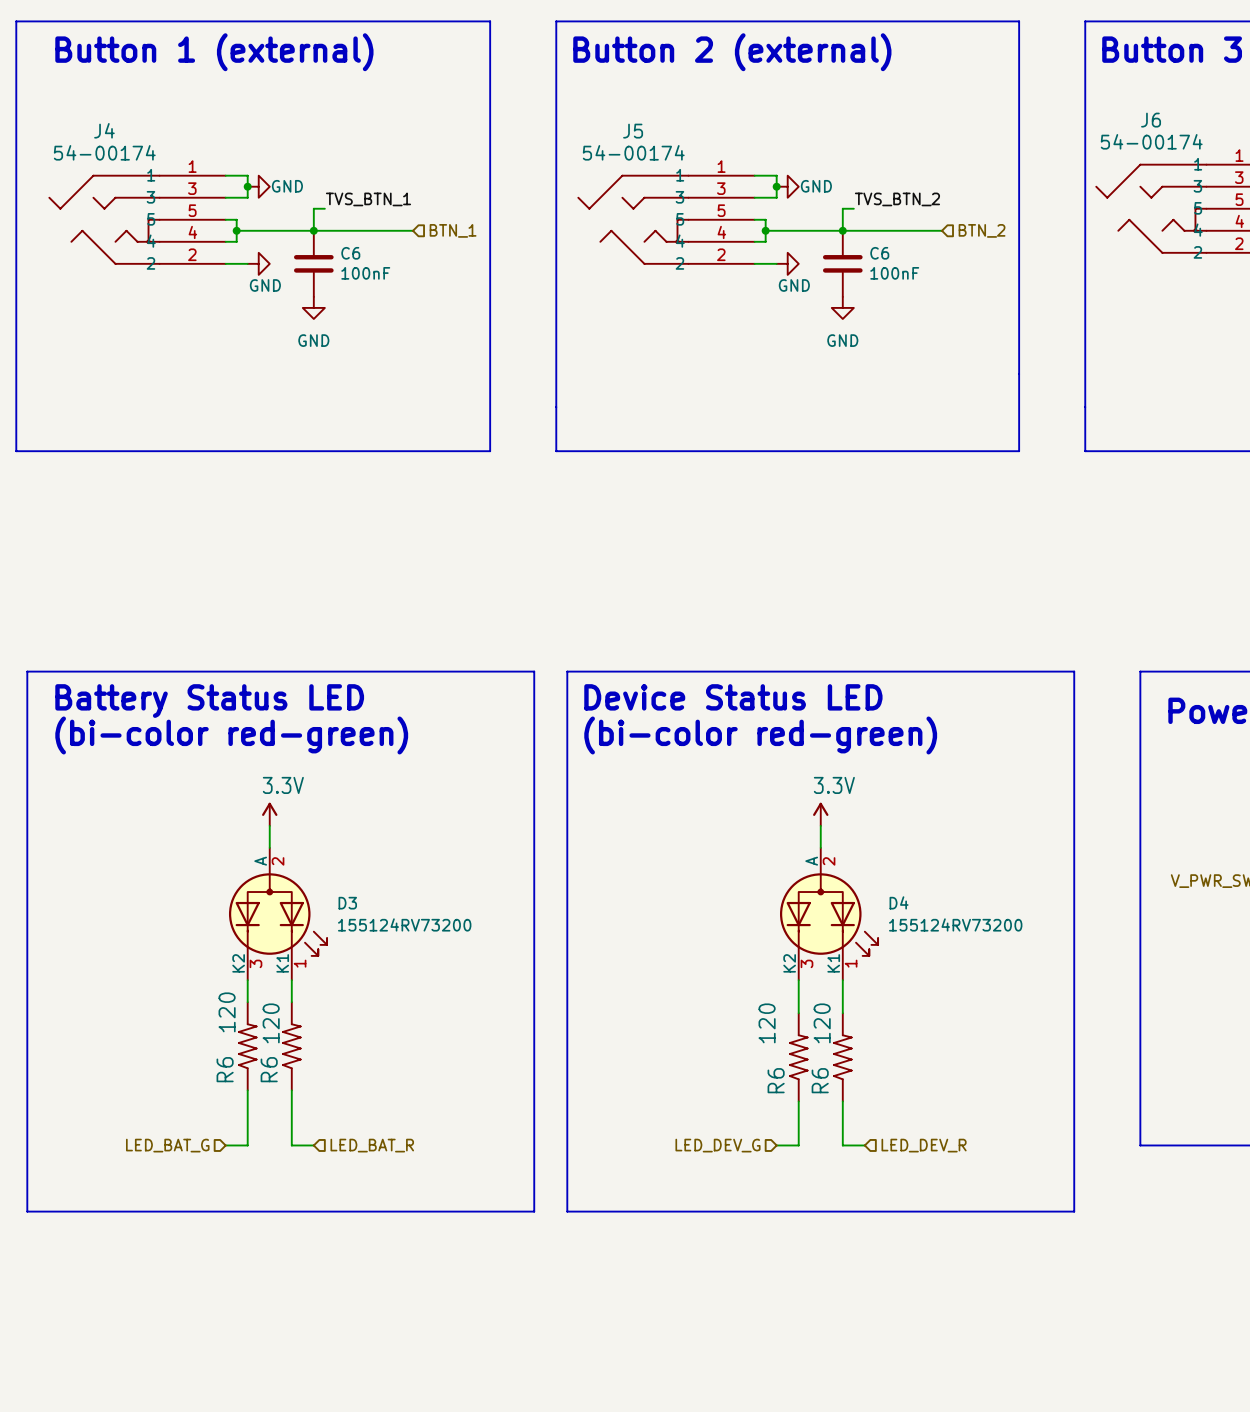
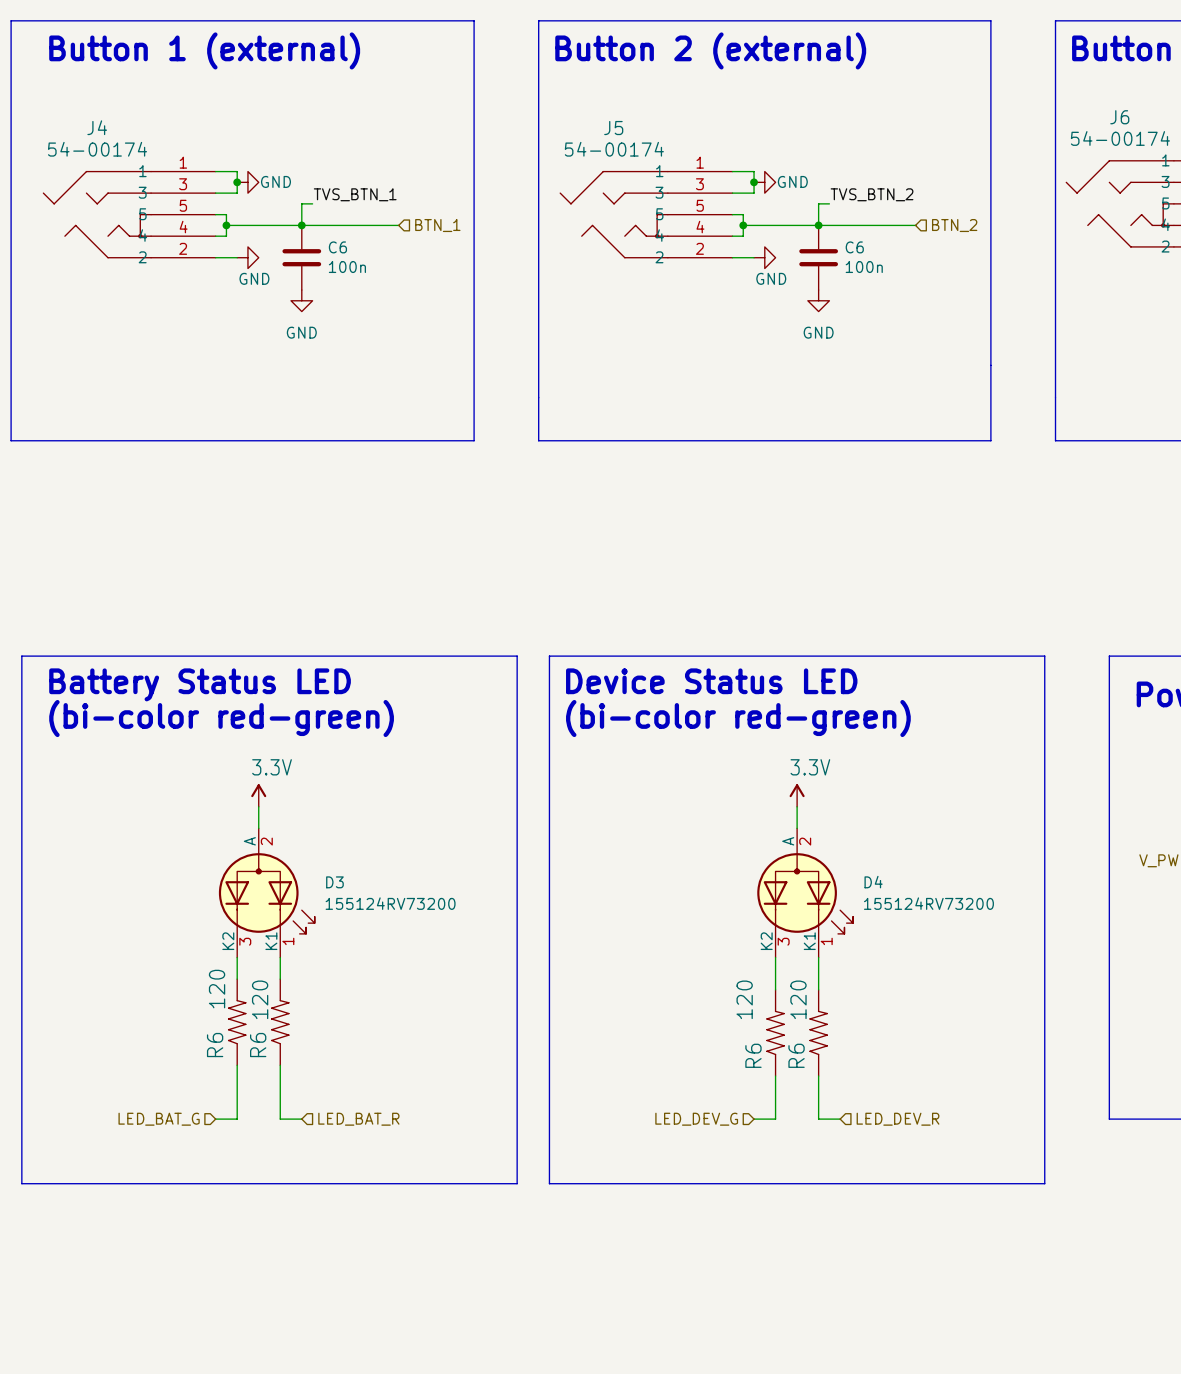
C6 value: 100nF (365, 273) -> 100n (347, 267)
C6 value: 100nF (894, 273) -> 100n (864, 267)

